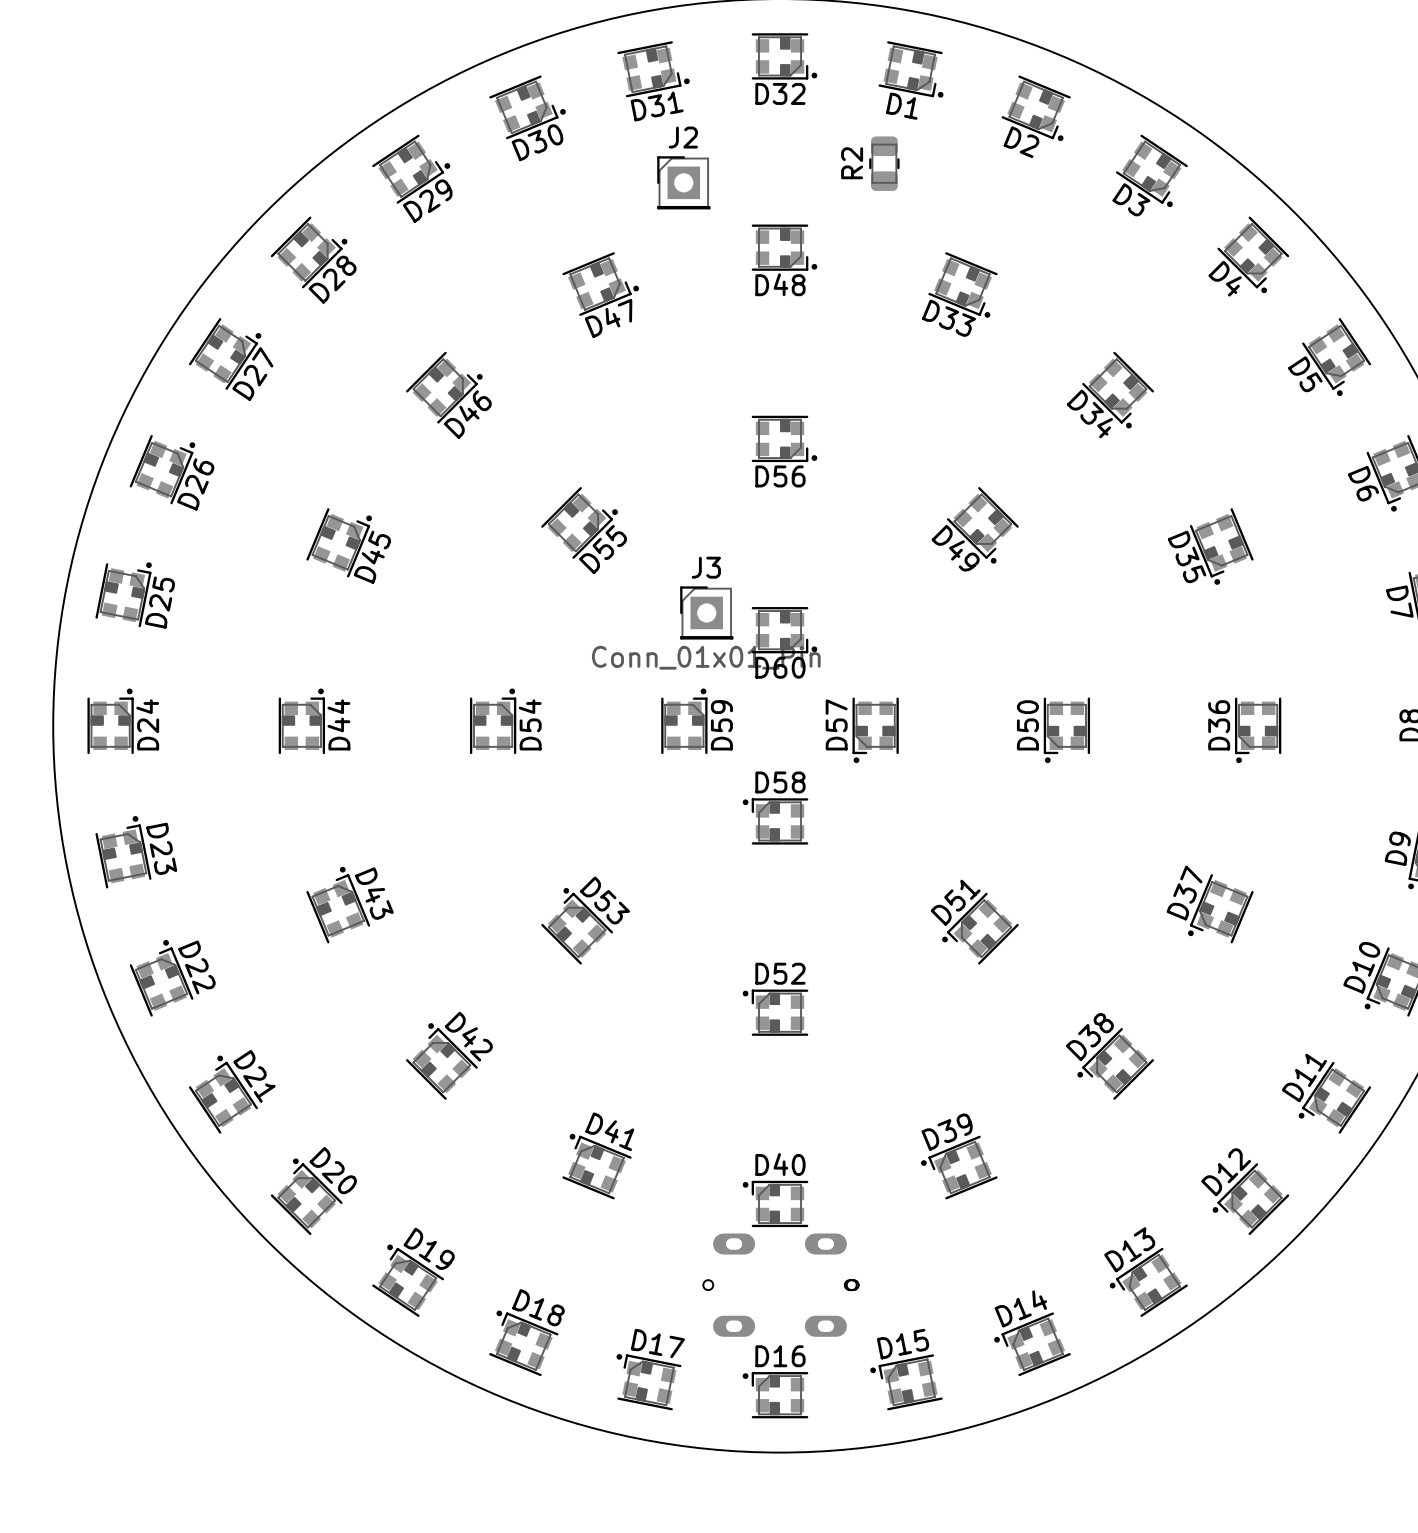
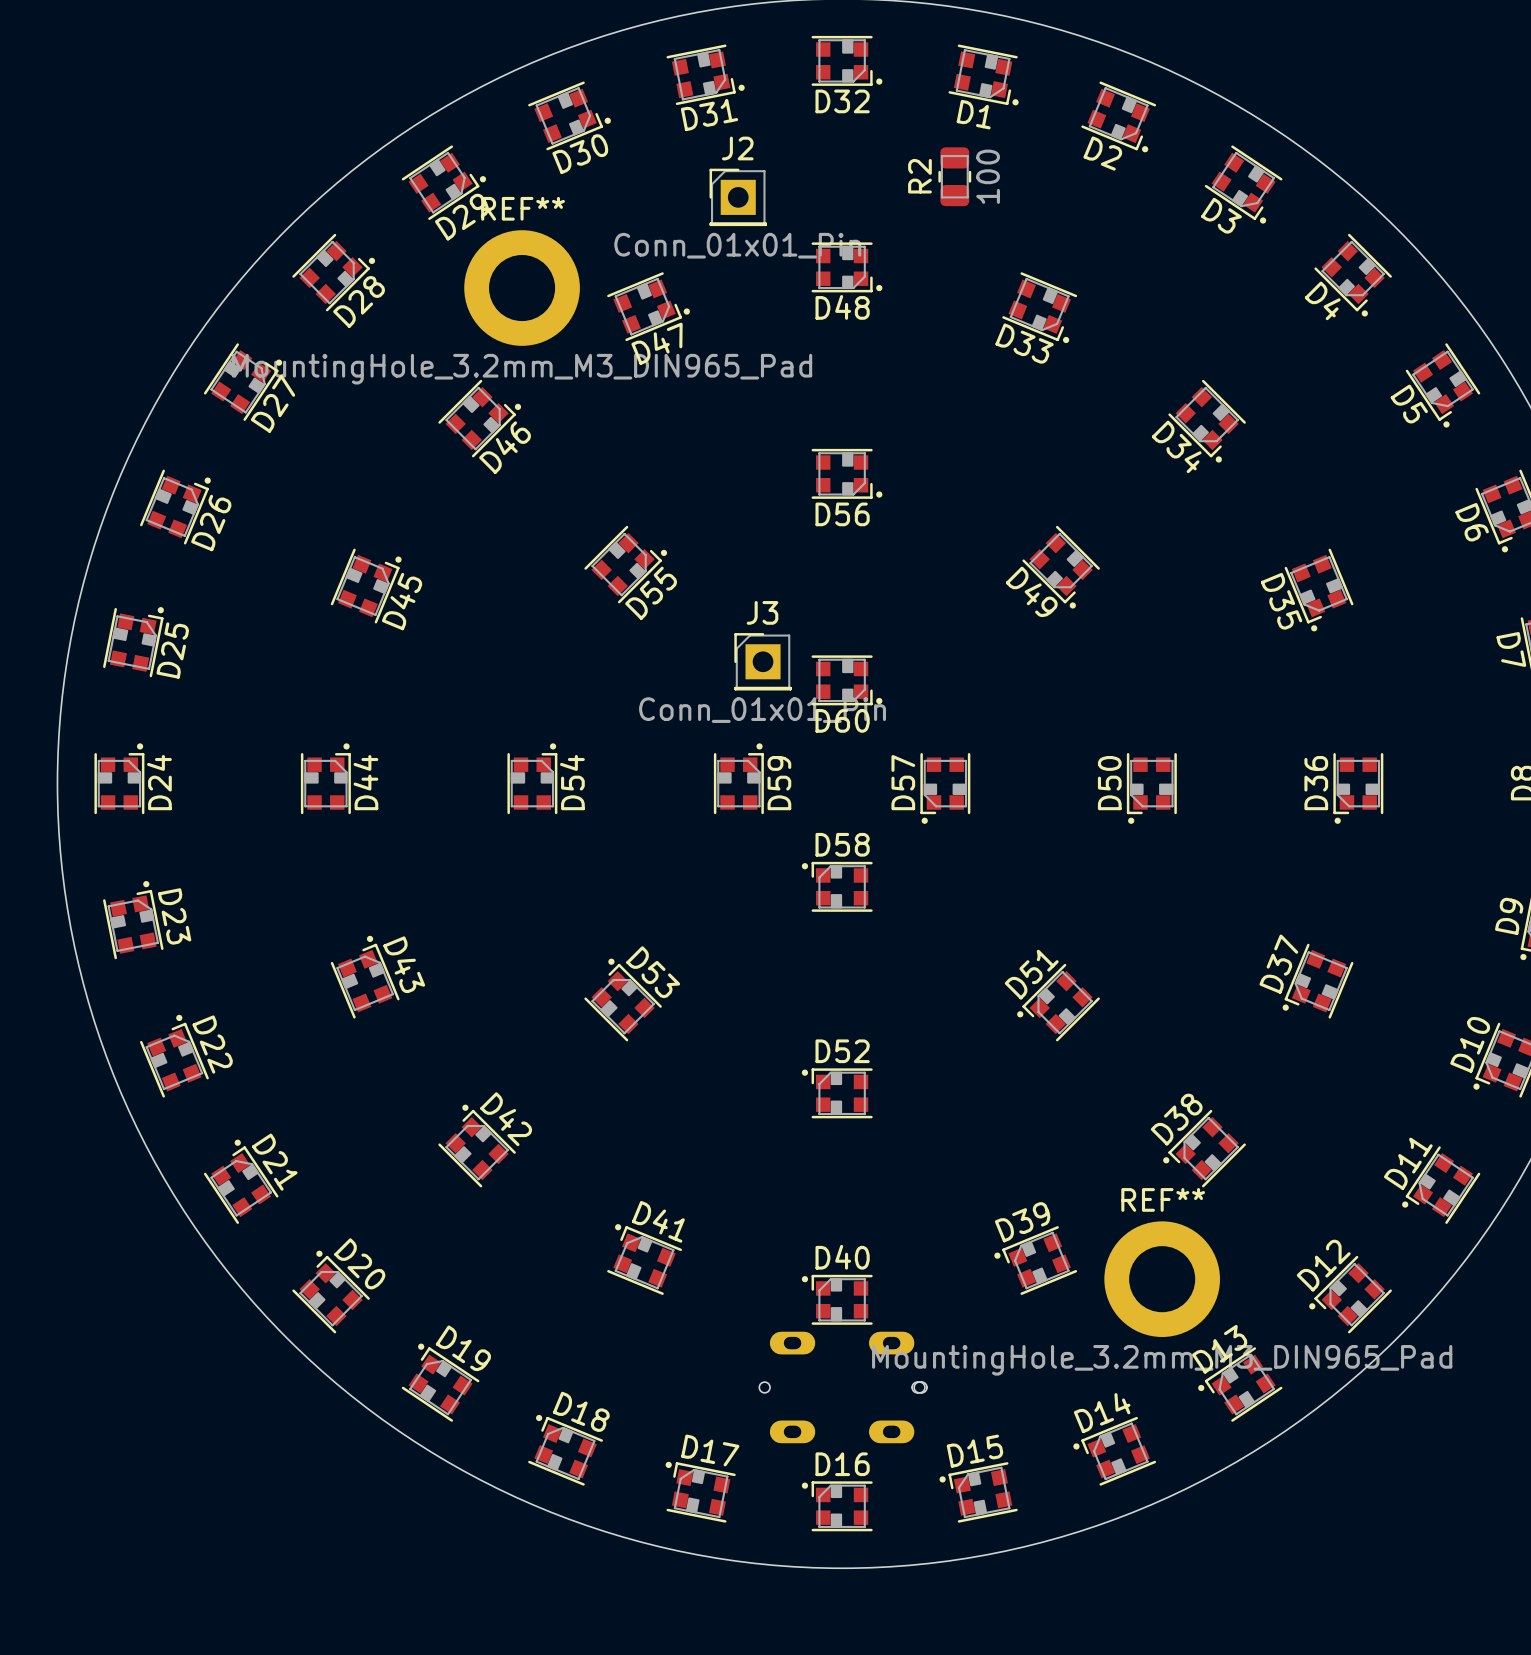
R2 value: none -> 100 (988, 176)
J2 value: none -> Conn_01x01_Pin (737, 245)
REF**: none -> MountingHole_3.2mm_M3_DIN965_Pad (522, 288)
REF**: none -> MountingHole_3.2mm_M3_DIN965_Pad (1162, 1279)

